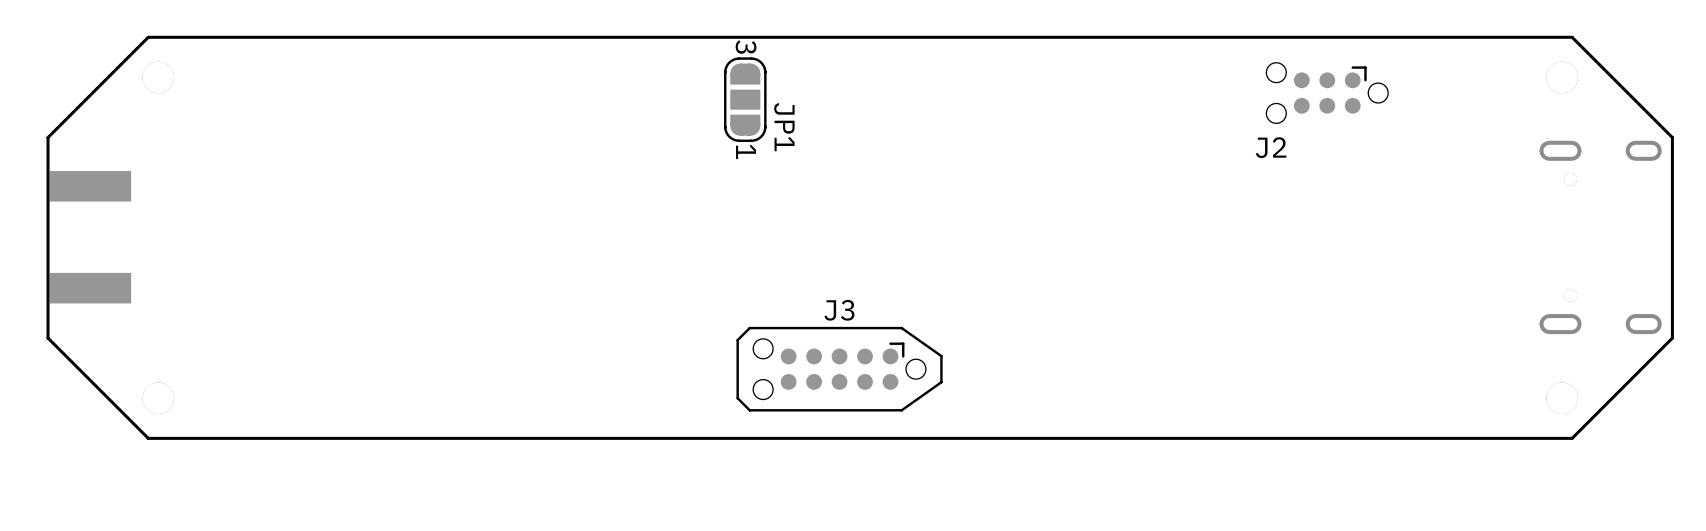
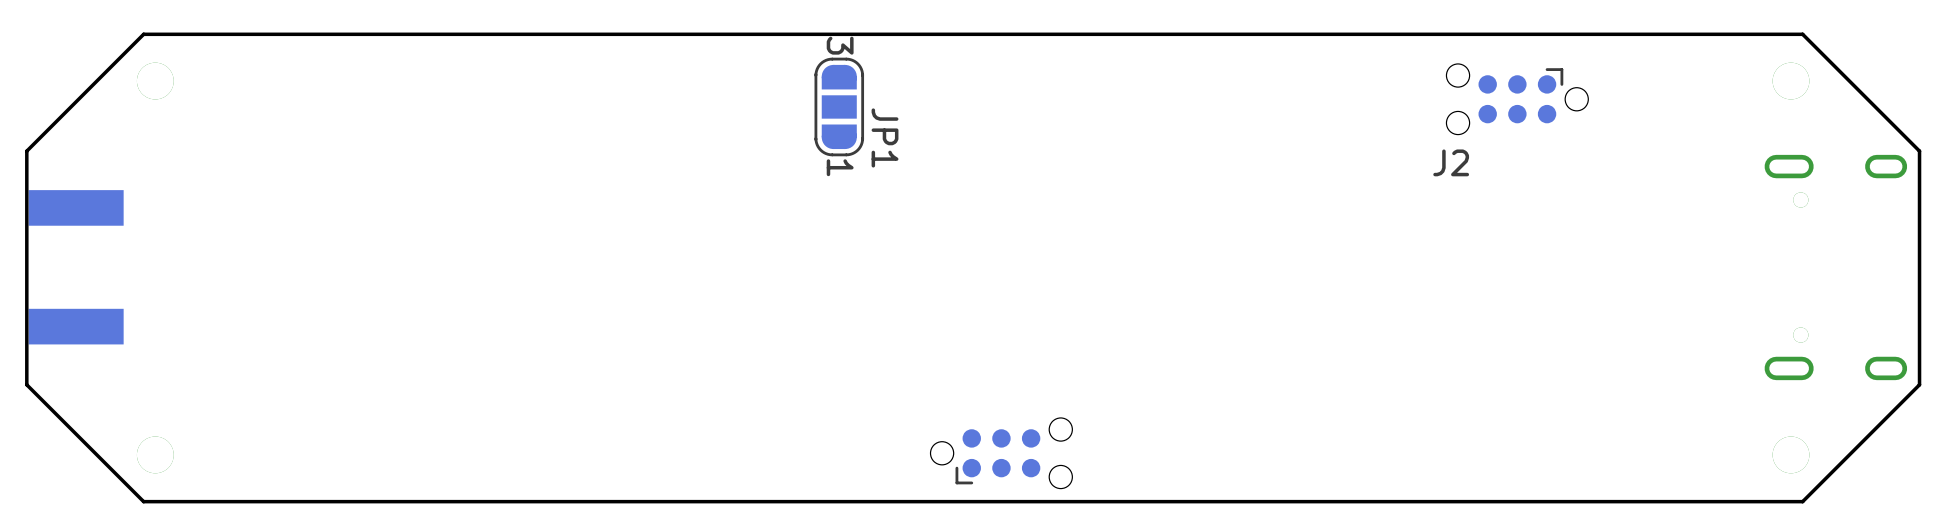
J3: (839, 369) -> none
part: none -> (1001, 453)

